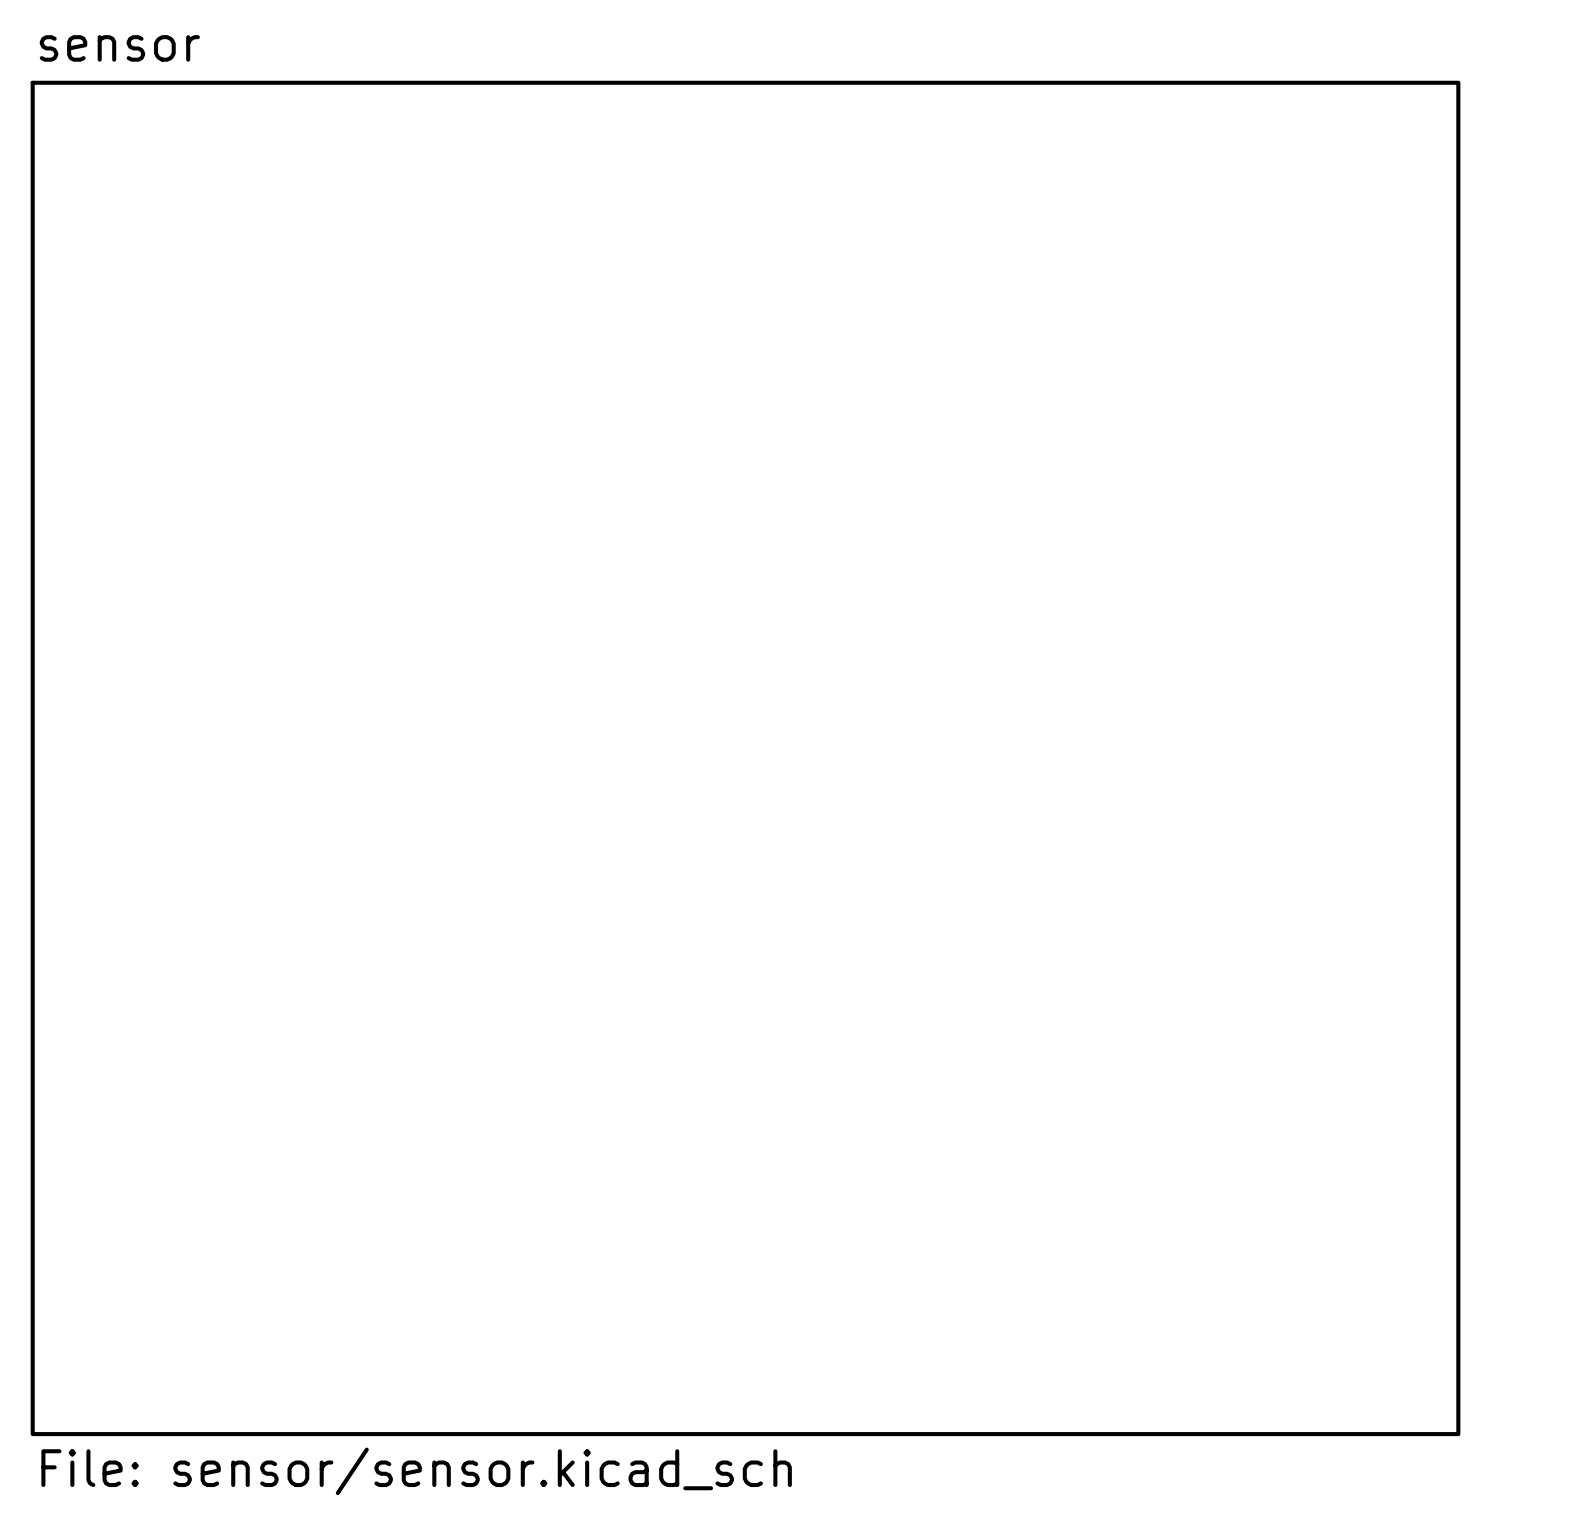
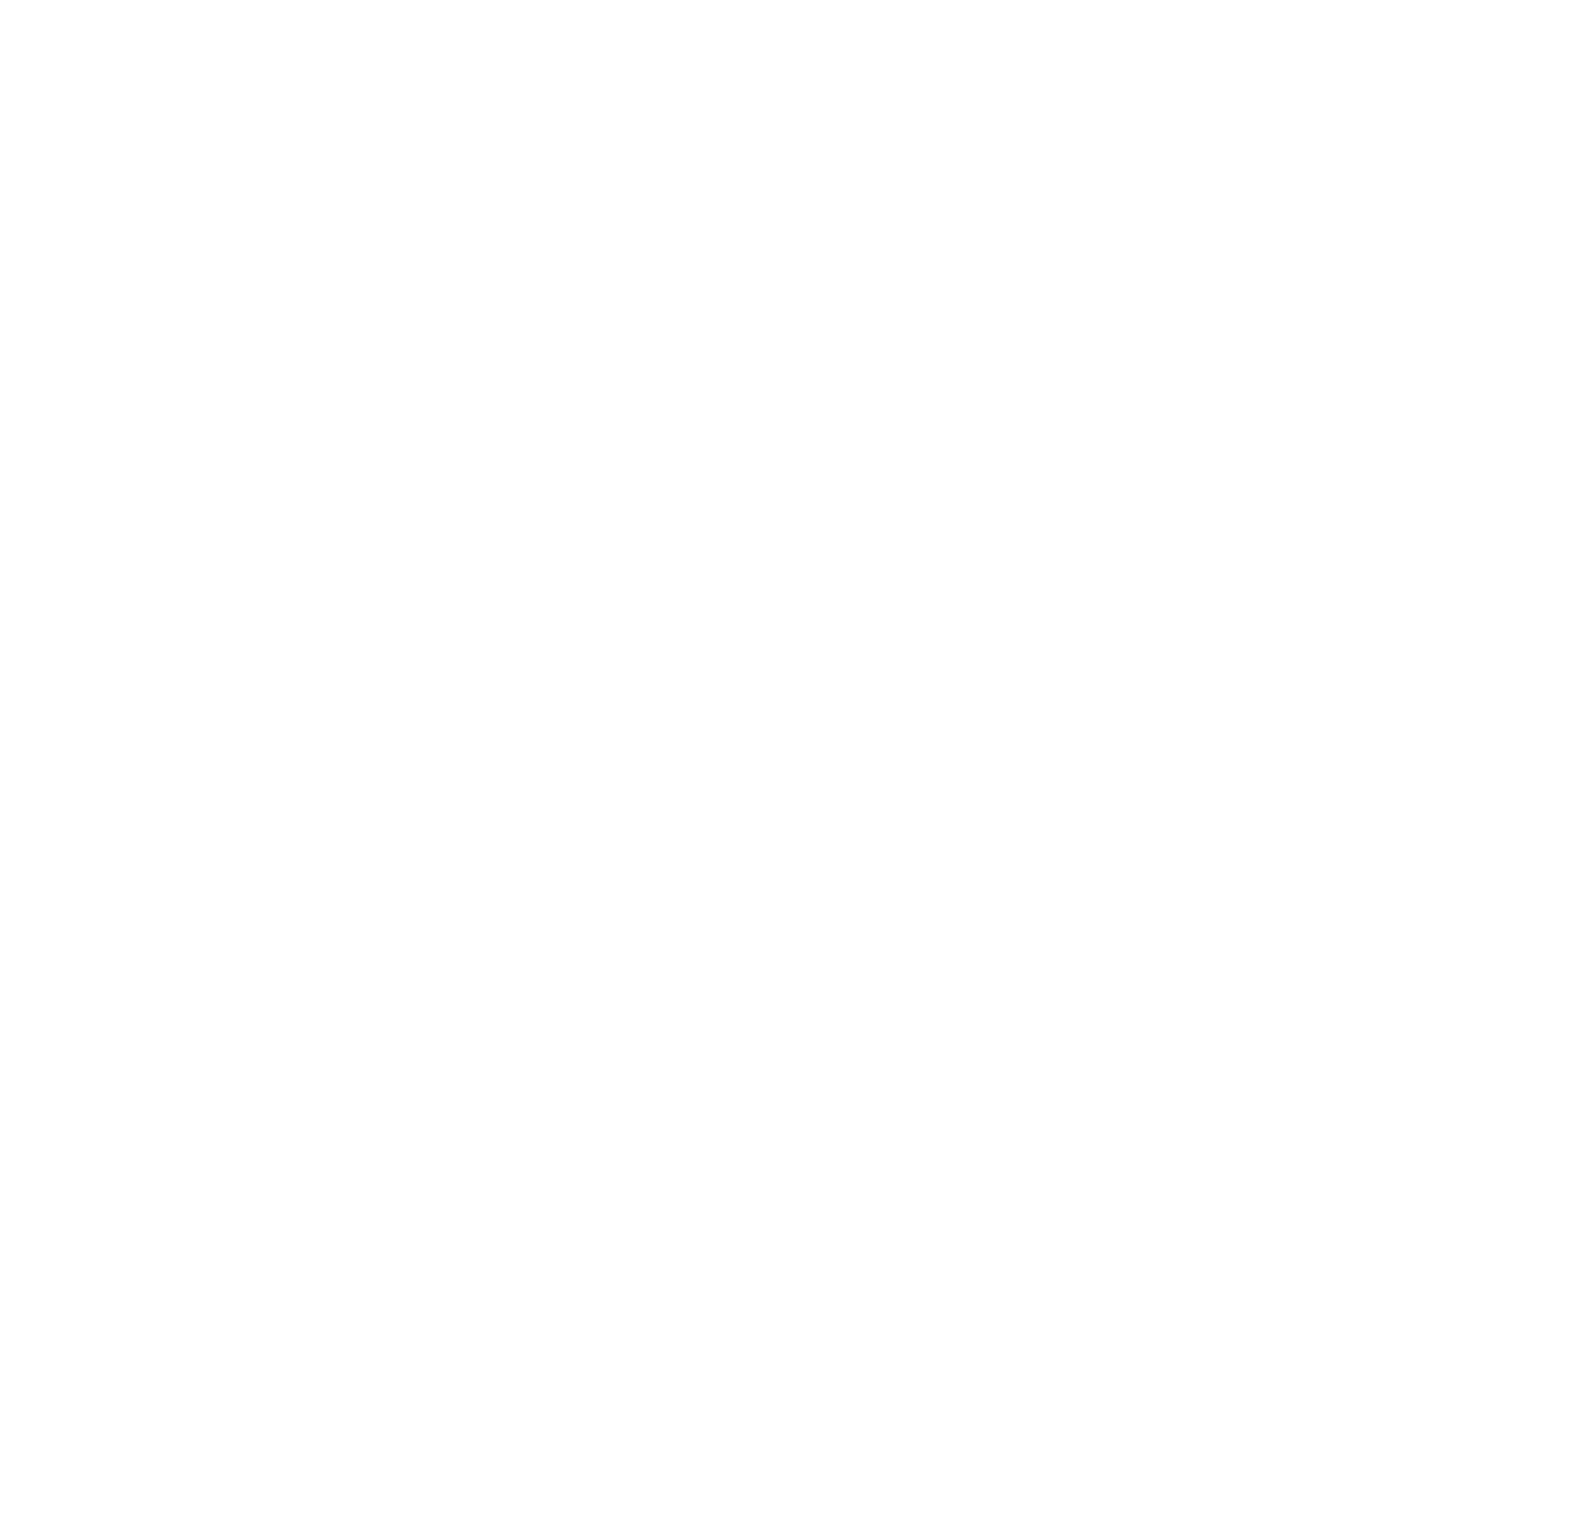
sheet sensor: File: sensor/sensor.kicad_sch (745, 758) -> none

